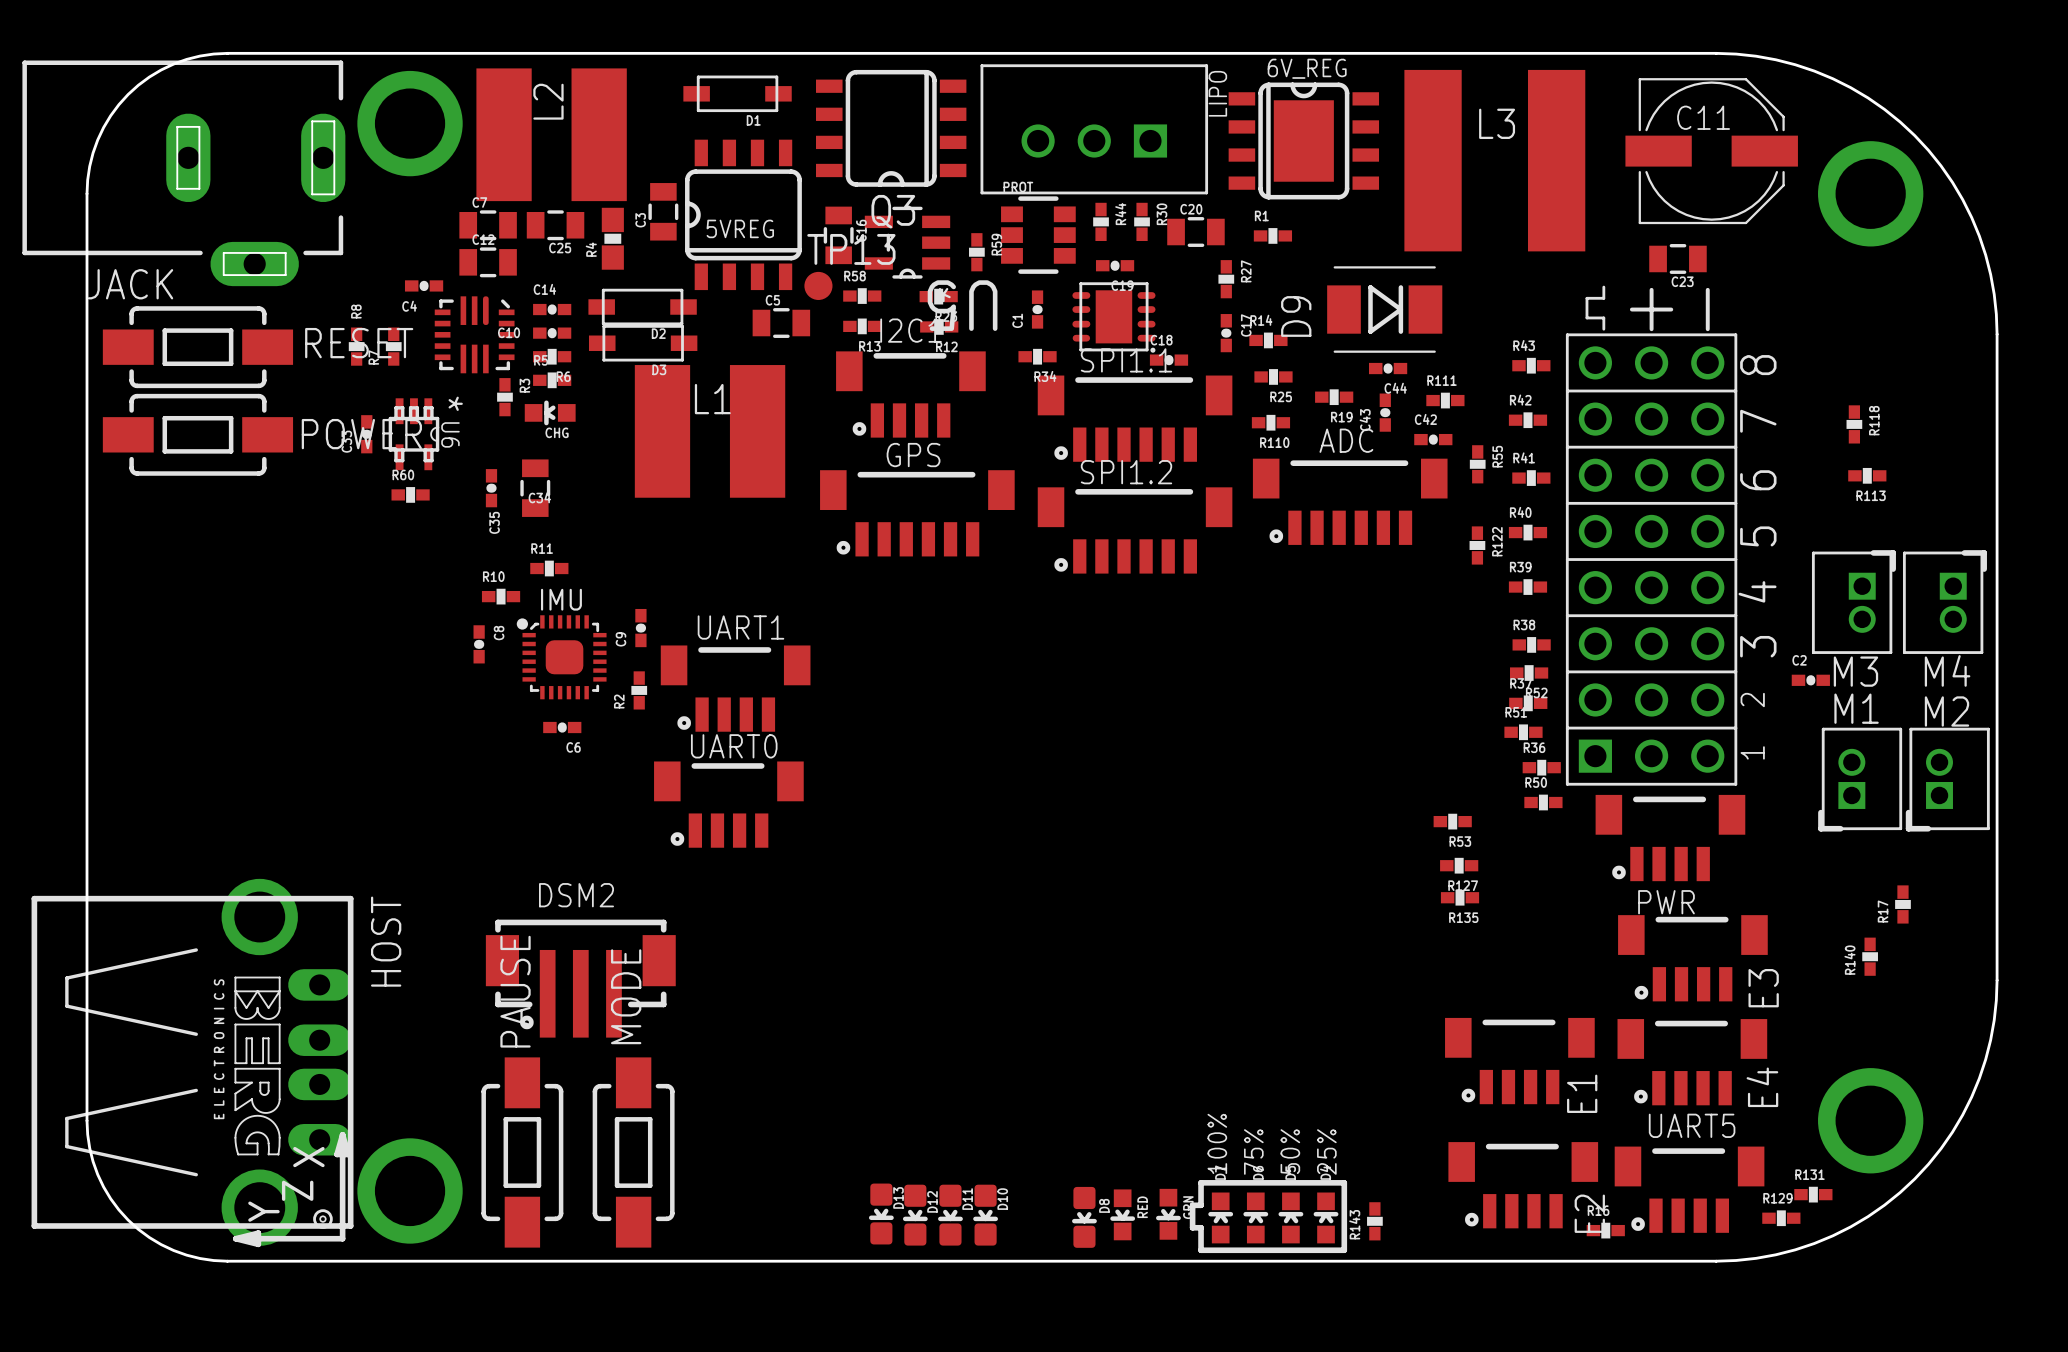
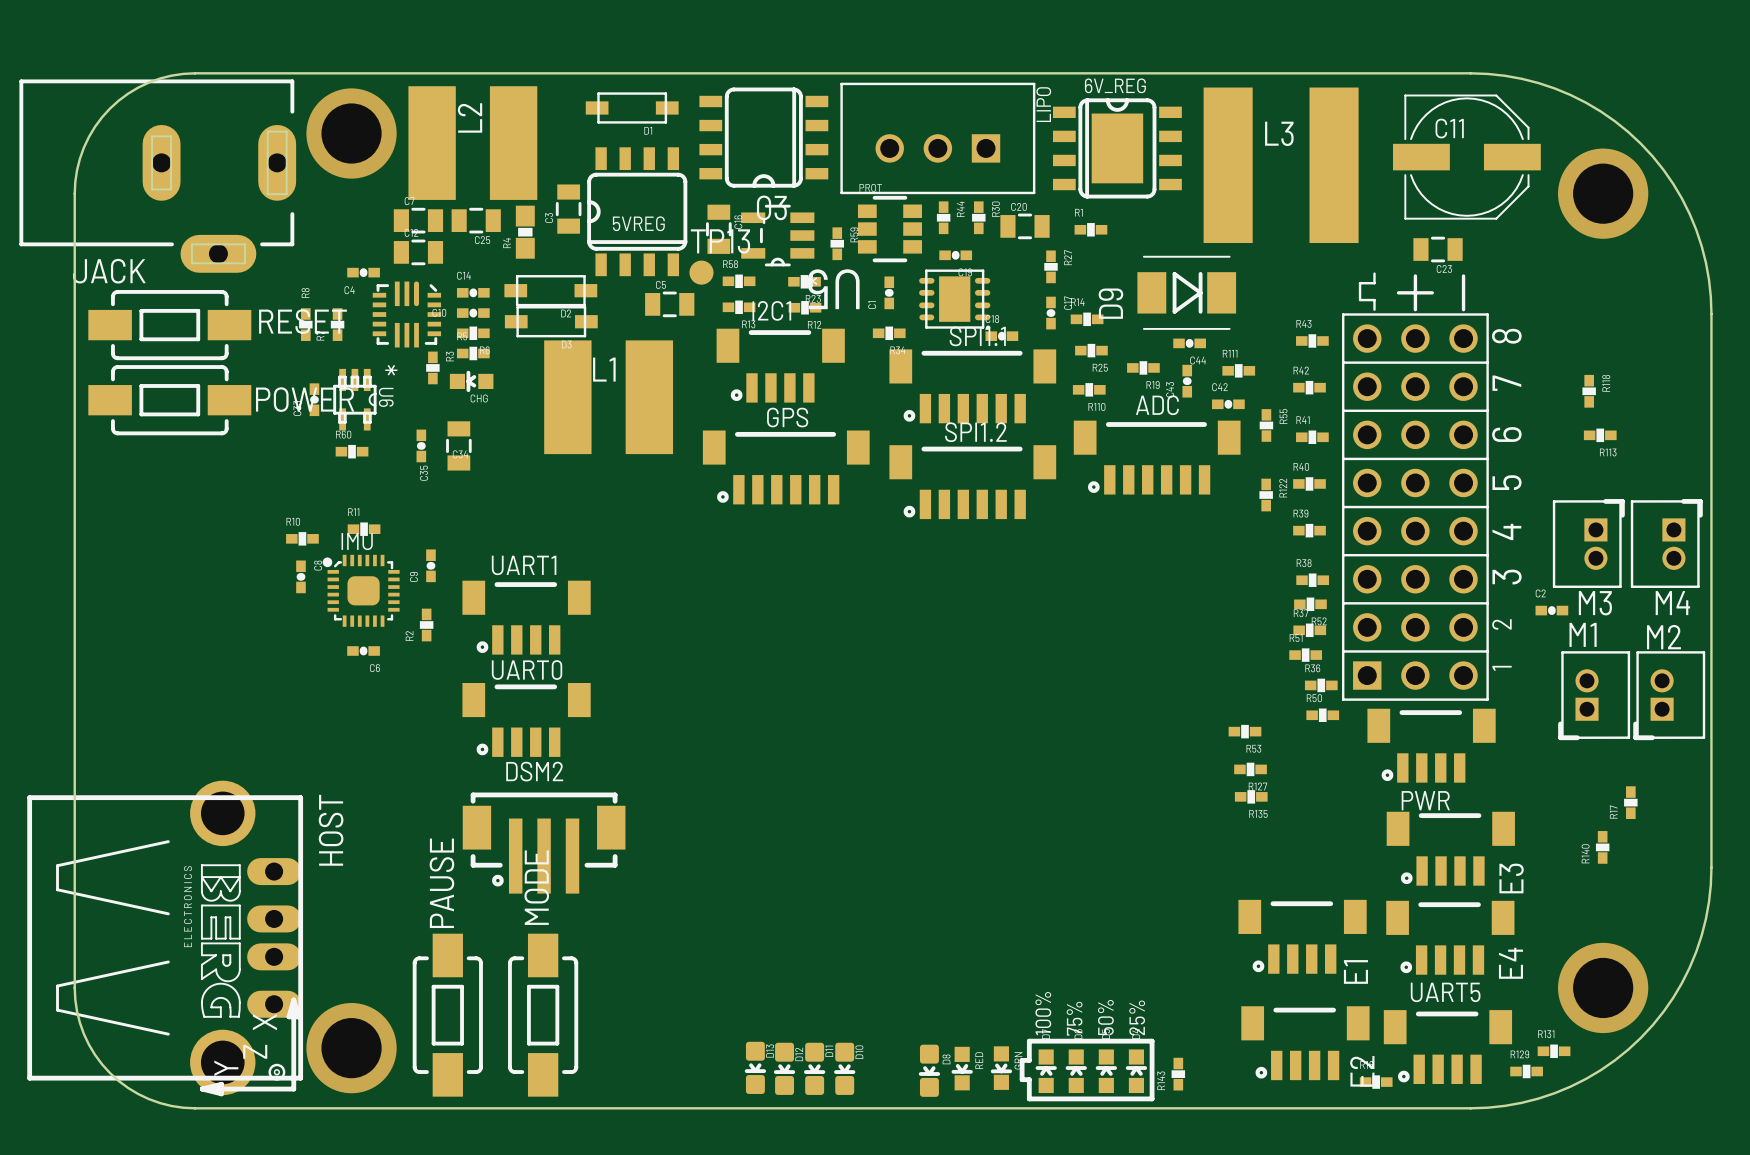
R11 position: (549, 568) -> (364, 529)
R10 position: (501, 596) -> (302, 538)
C9 position: (640, 628) -> (430, 565)
C8 position: (479, 644) -> (300, 576)
IMU position: (561, 657) -> (361, 590)
UART1 position: (735, 688) -> (526, 617)
R2 position: (639, 690) -> (426, 625)
C6 position: (562, 727) -> (363, 650)
UART0 position: (728, 804) -> (526, 719)
DSM2 position: (580, 978) -> (544, 843)

